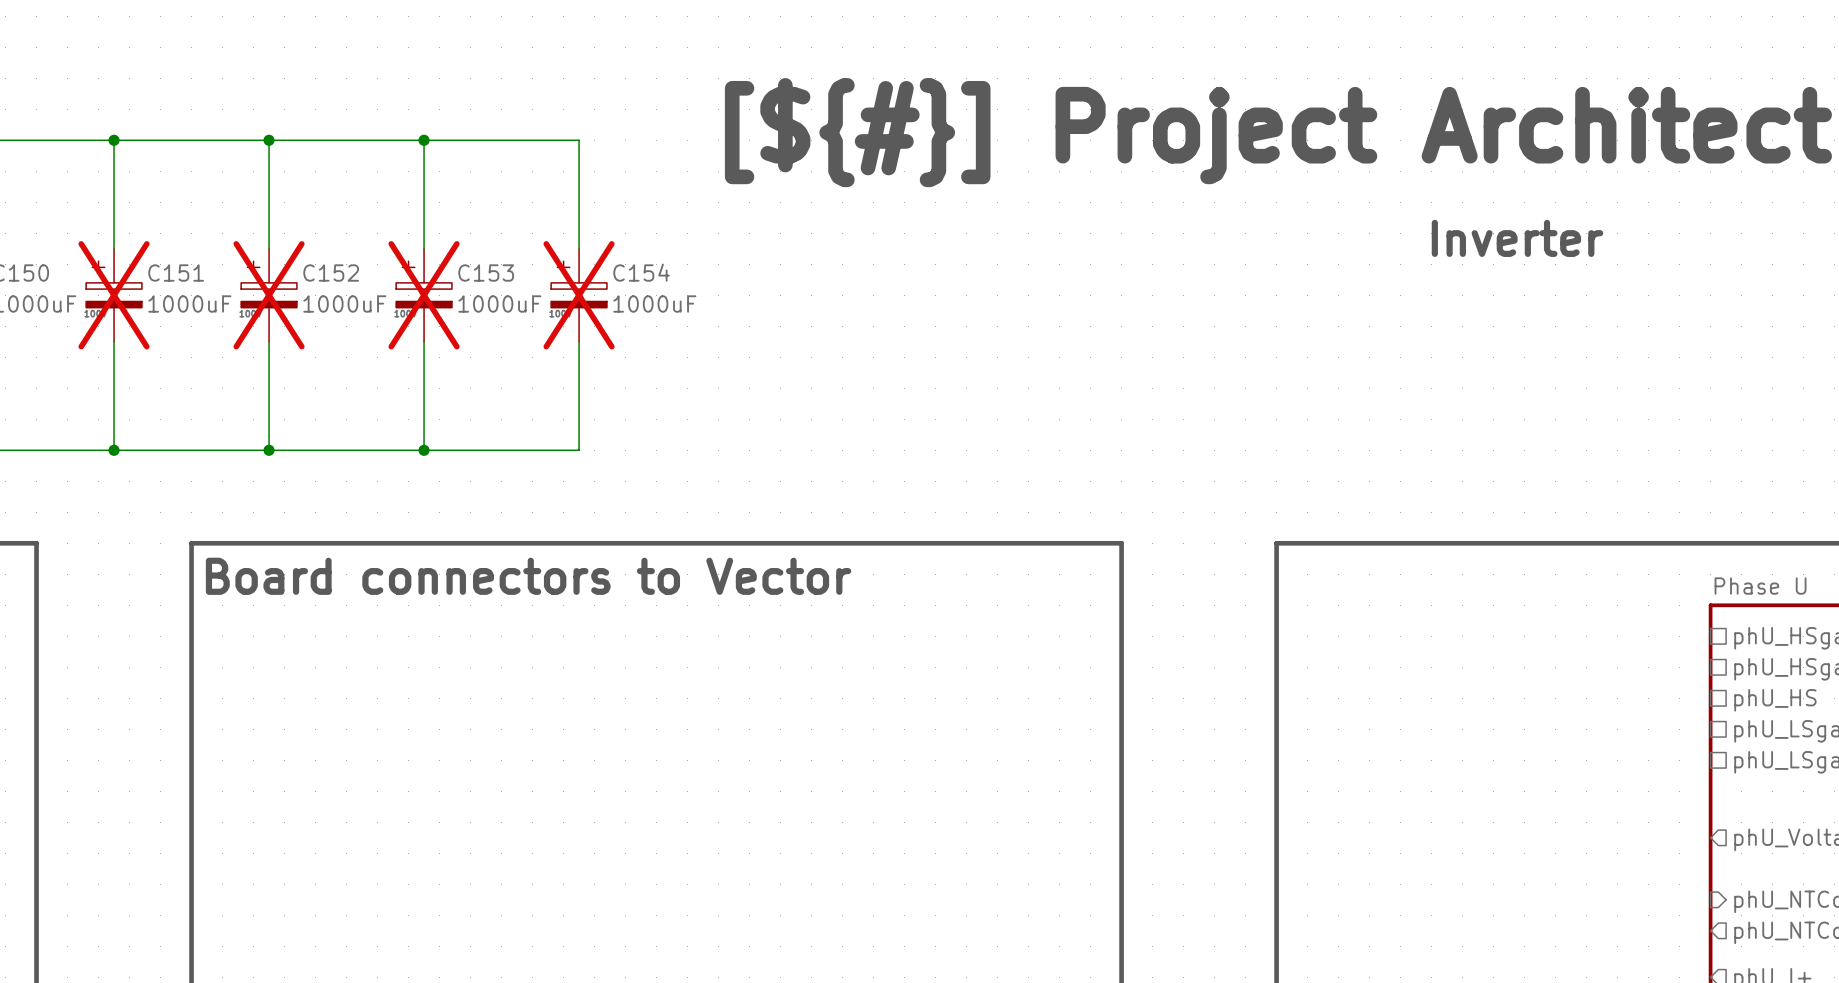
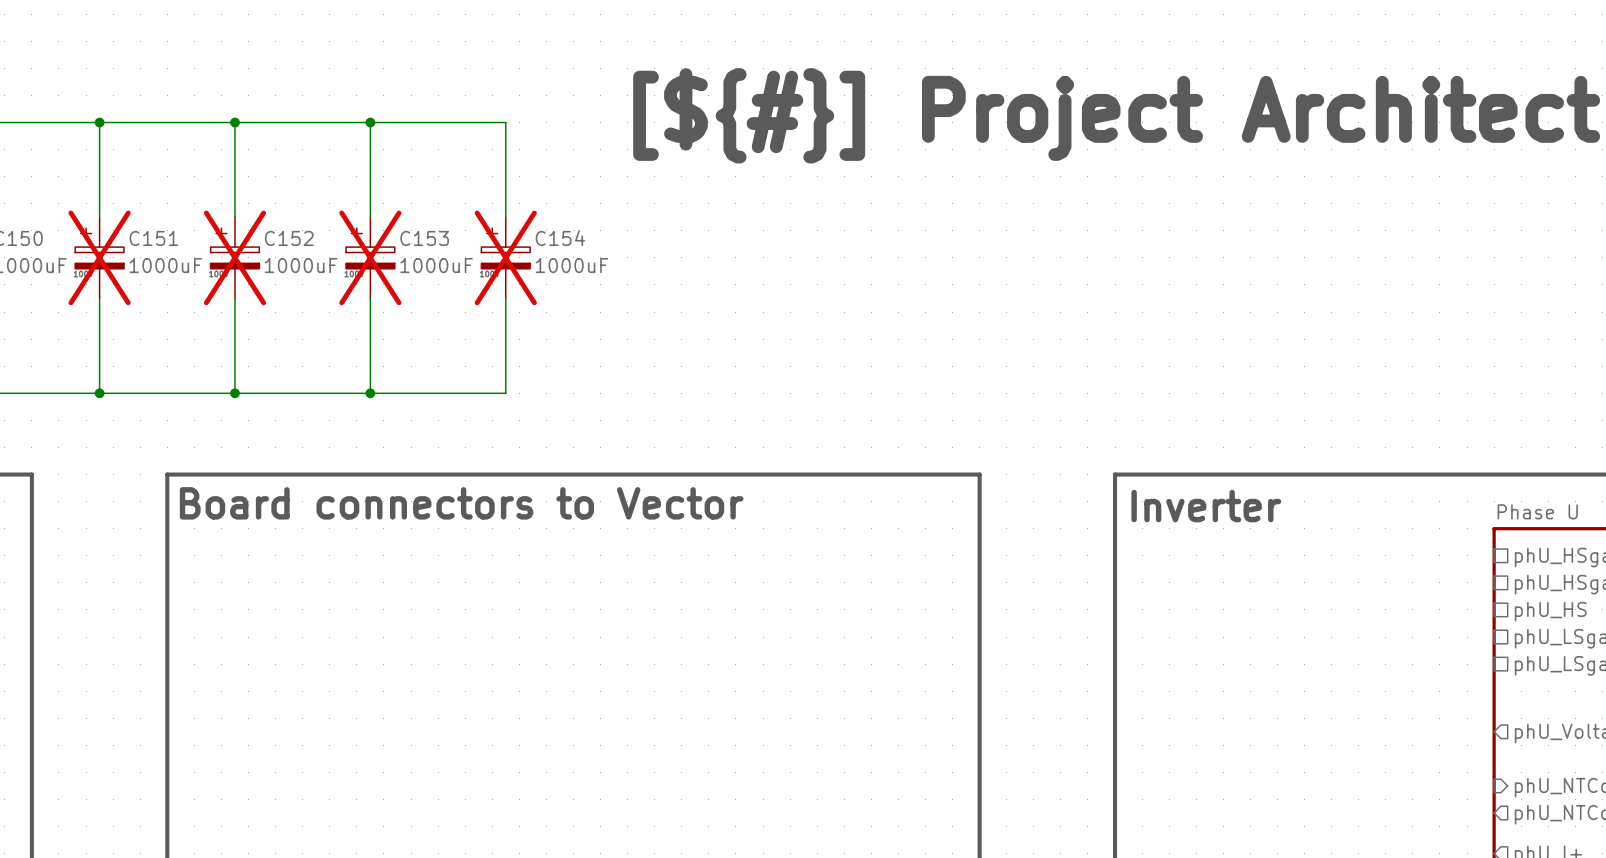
text: Inverter (1517, 238) -> none
text: none -> Inverter (1206, 506)

